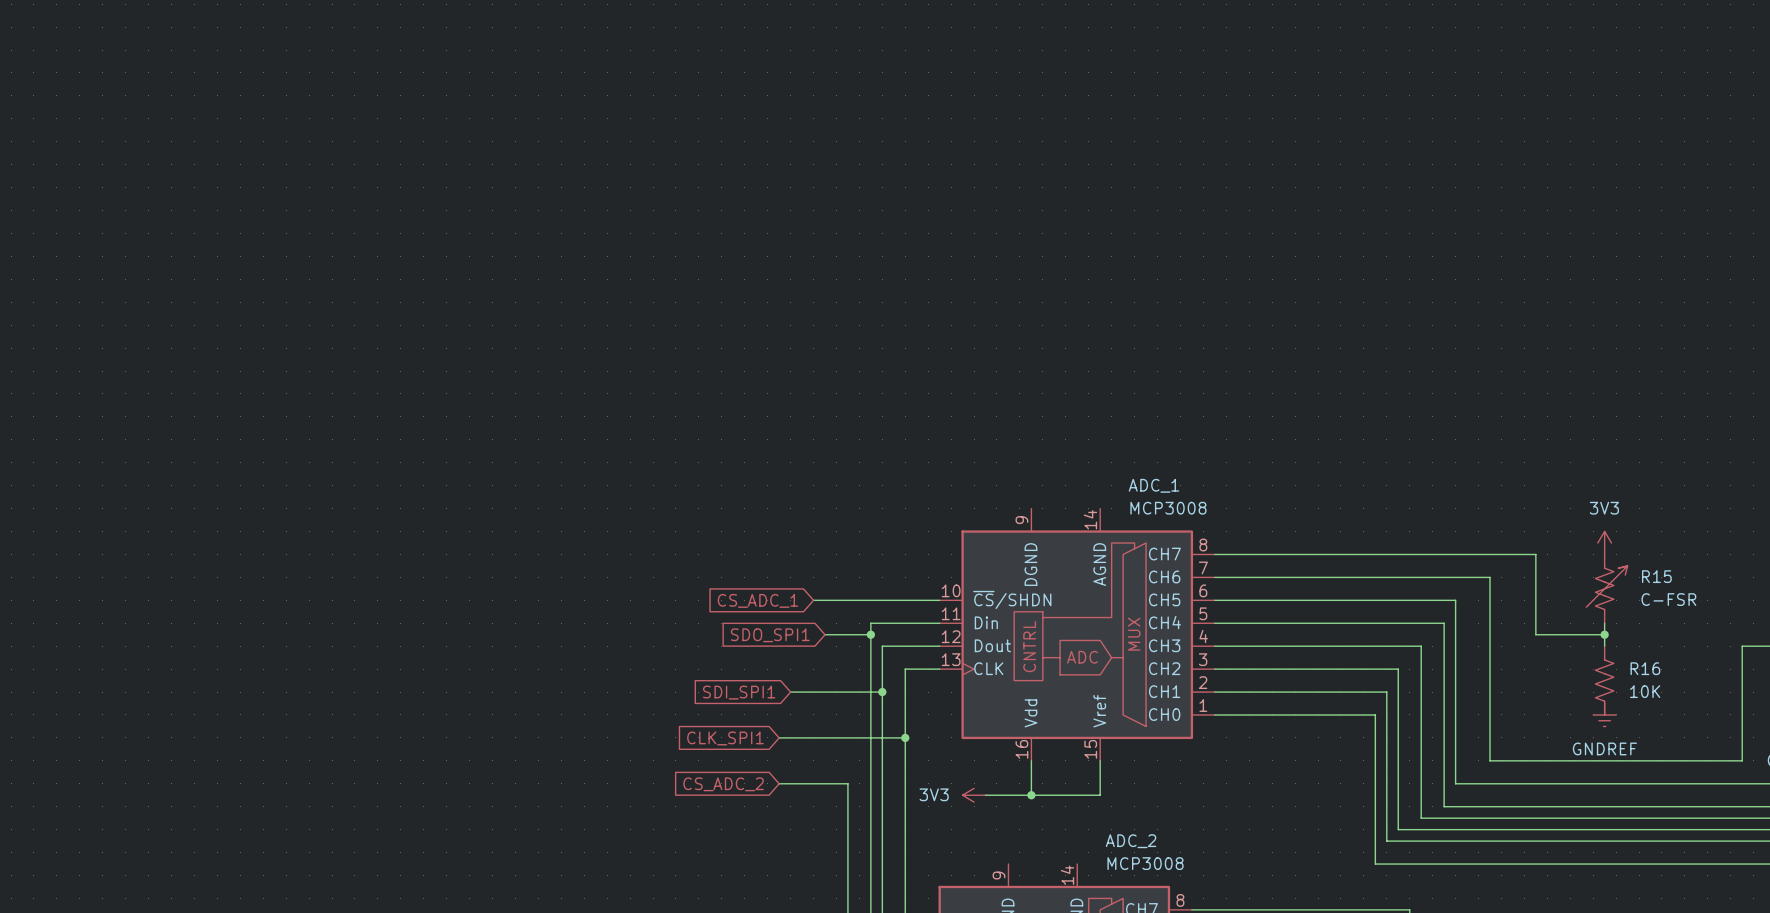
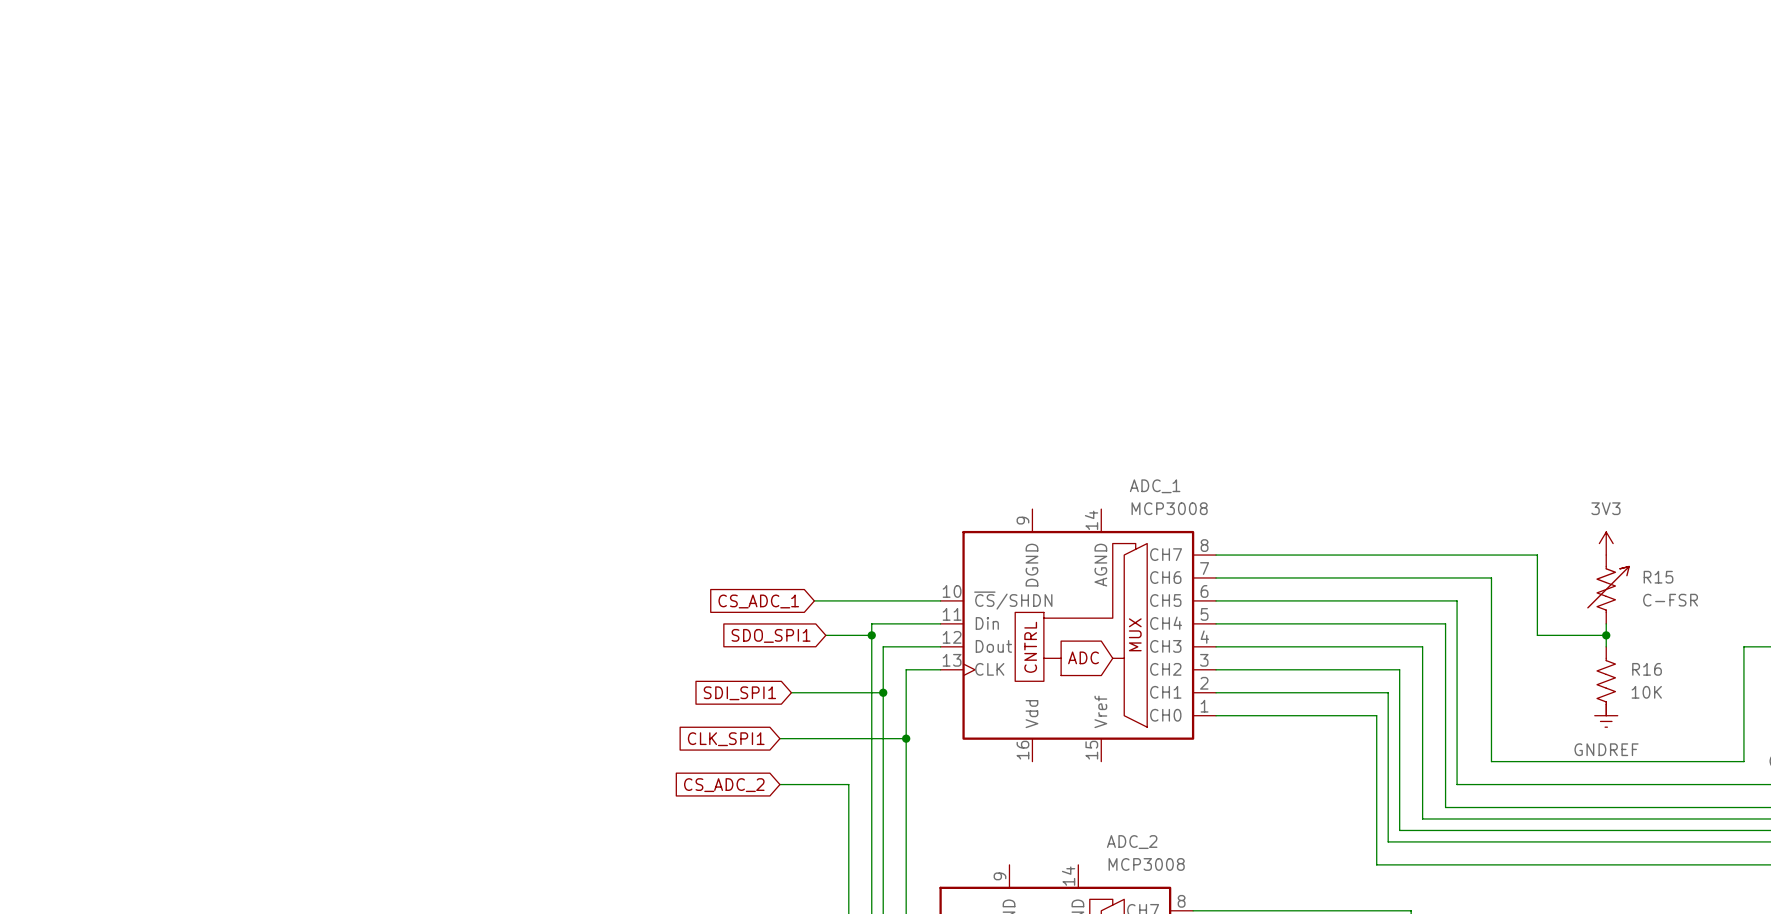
wire: (1031, 760) (1031, 795) -> none
wire: (1100, 760) (1100, 795) (985, 795) -> none
power symbol: 3V3 (974, 795) -> none
junction: (1031, 795) -> none

